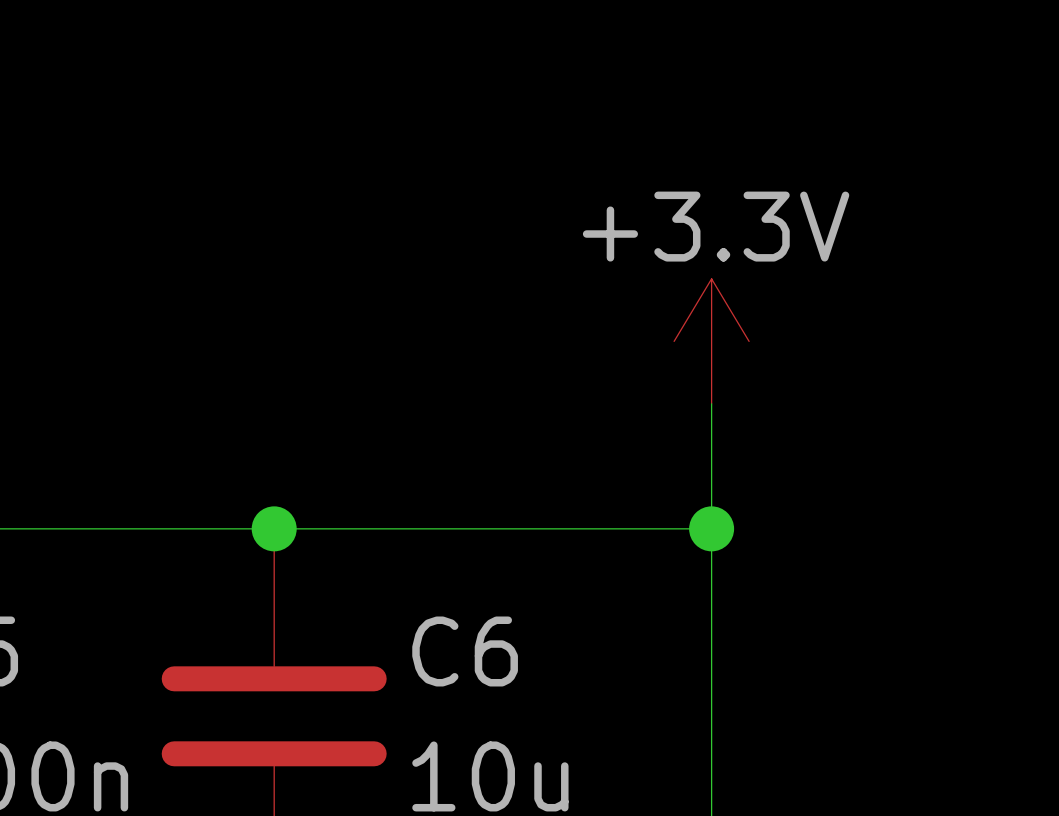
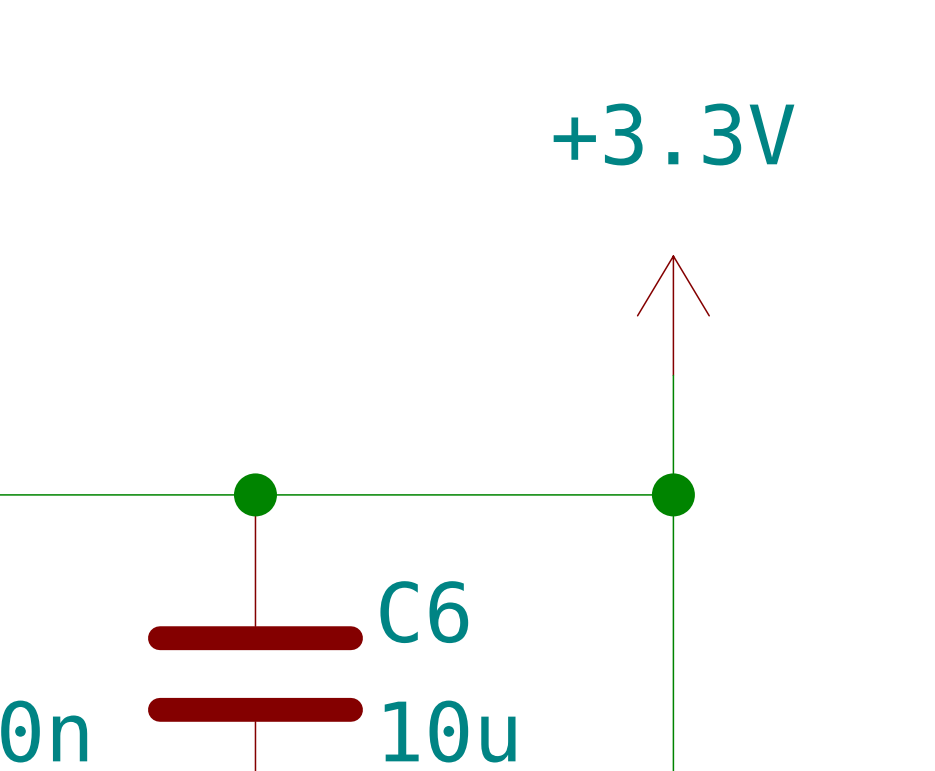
power symbol text position: +3.3V (716, 226) -> +3.3V (674, 134)

